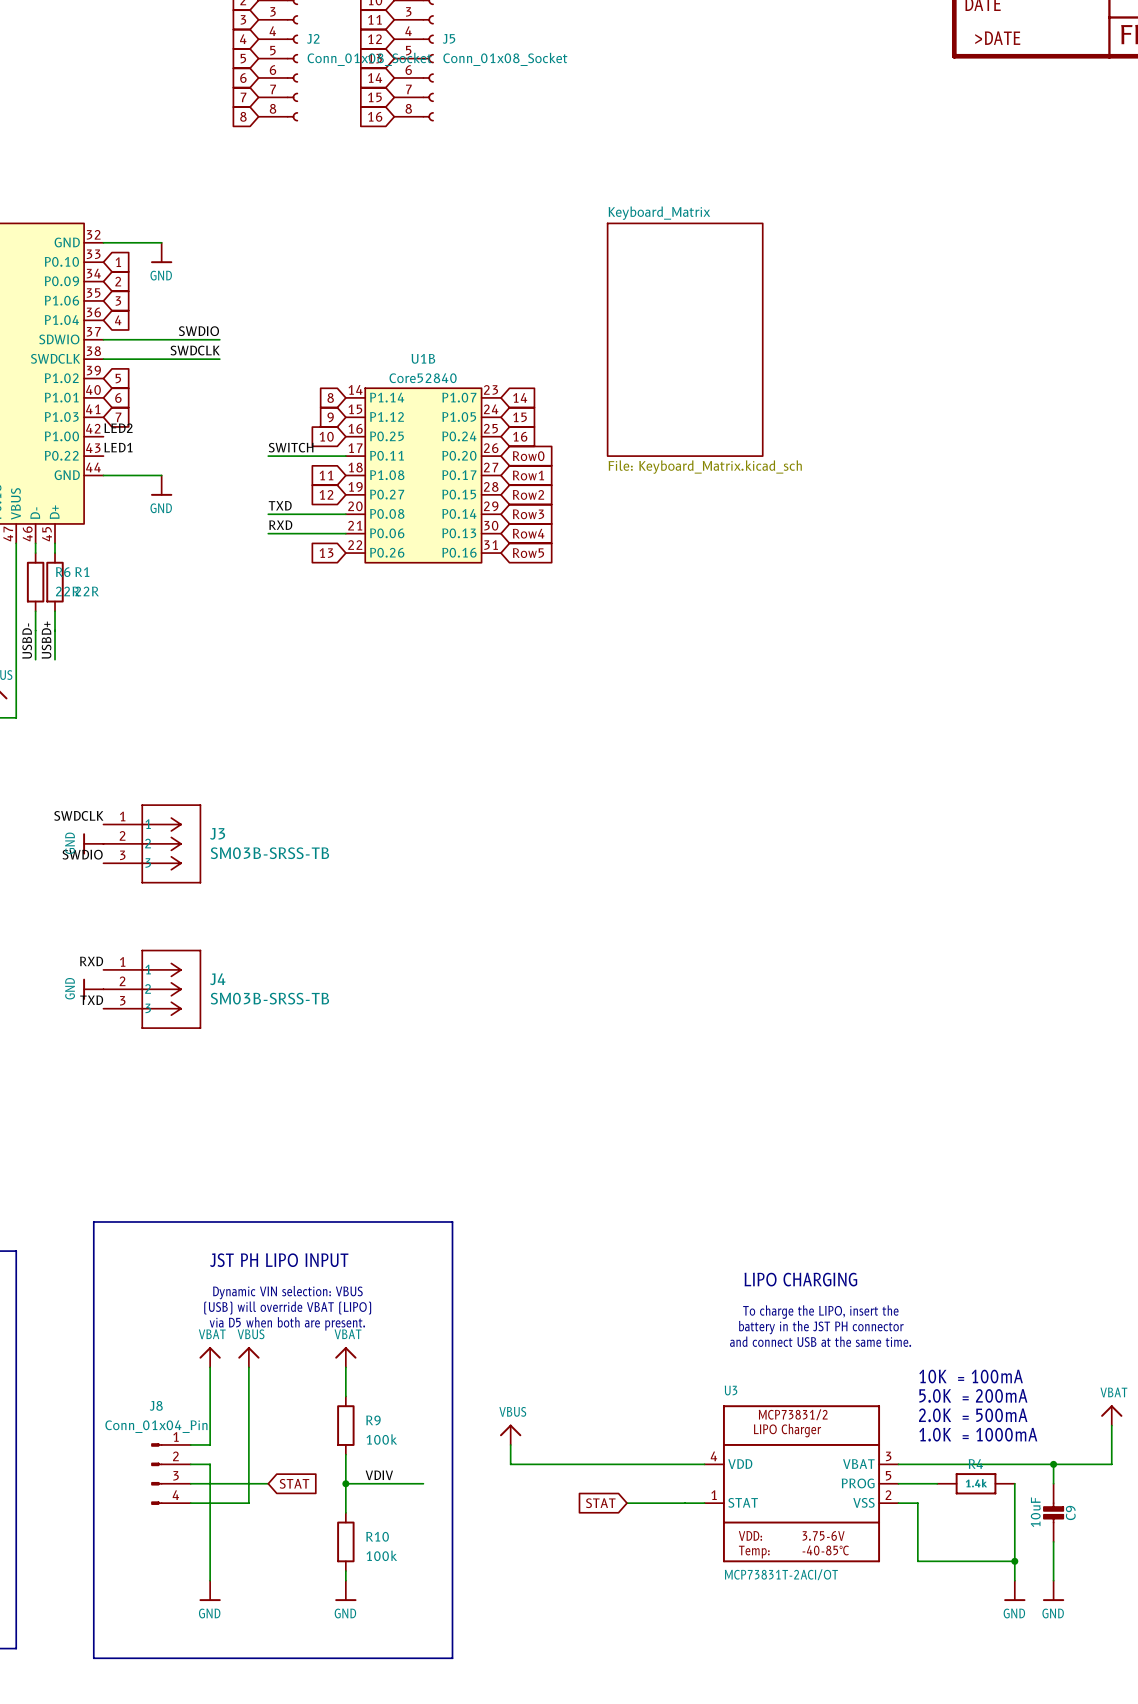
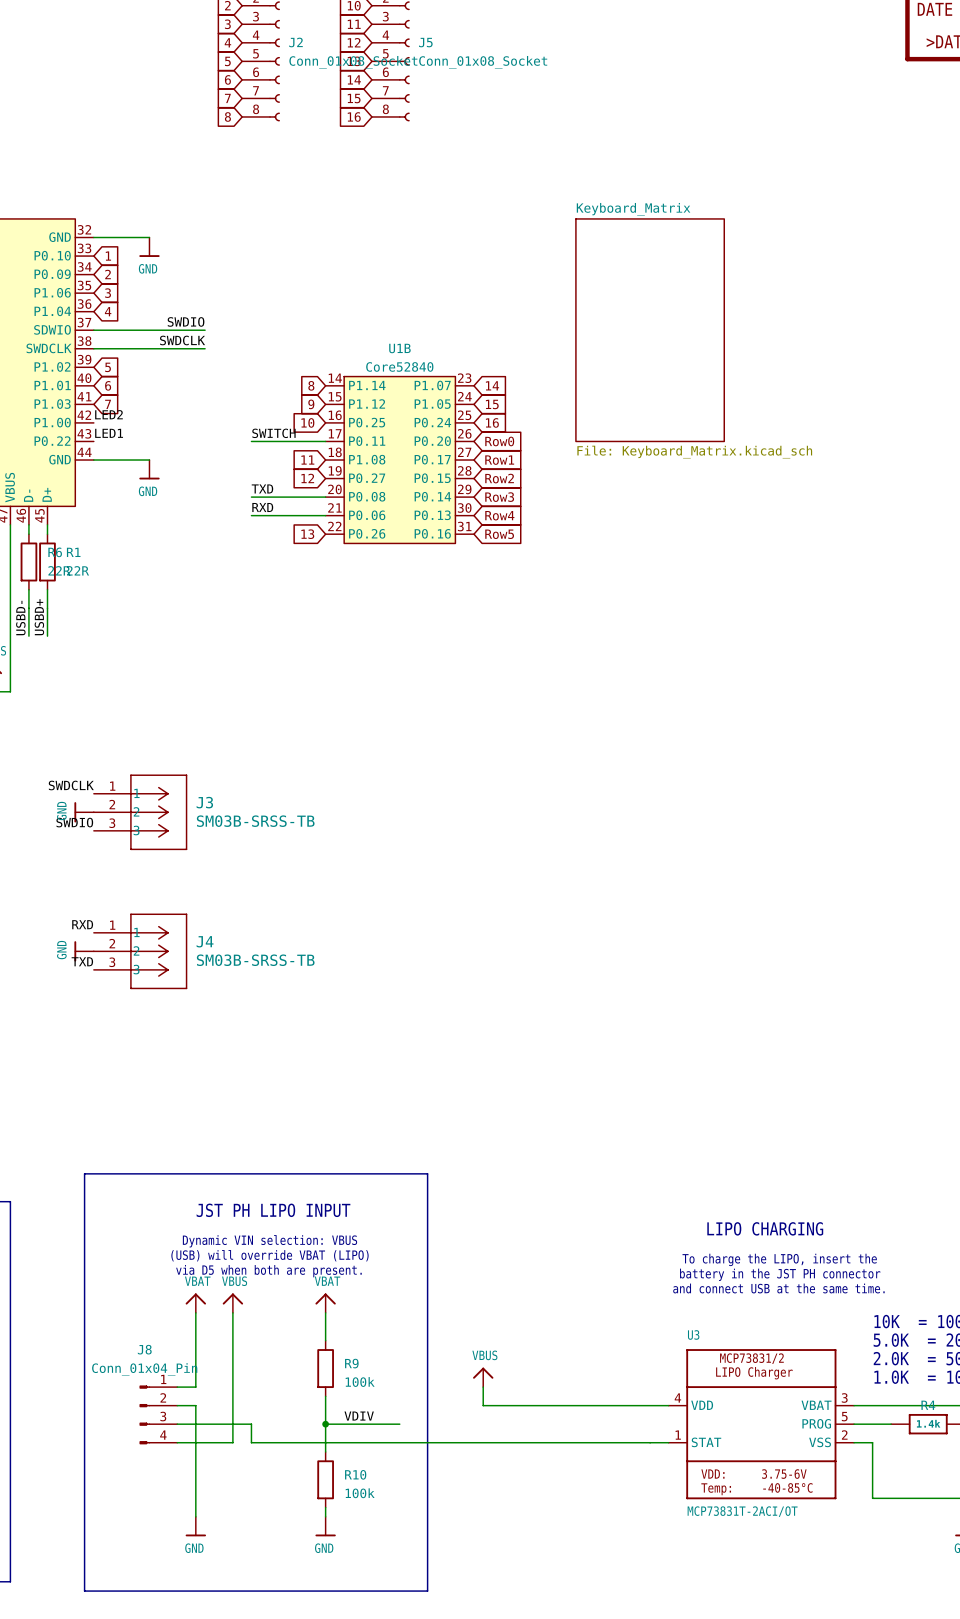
wire: none -> (251, 1424) (251, 1442) (594, 1442)
global label: STAT (294, 1483) -> none
global label: STAT (600, 1503) -> none

